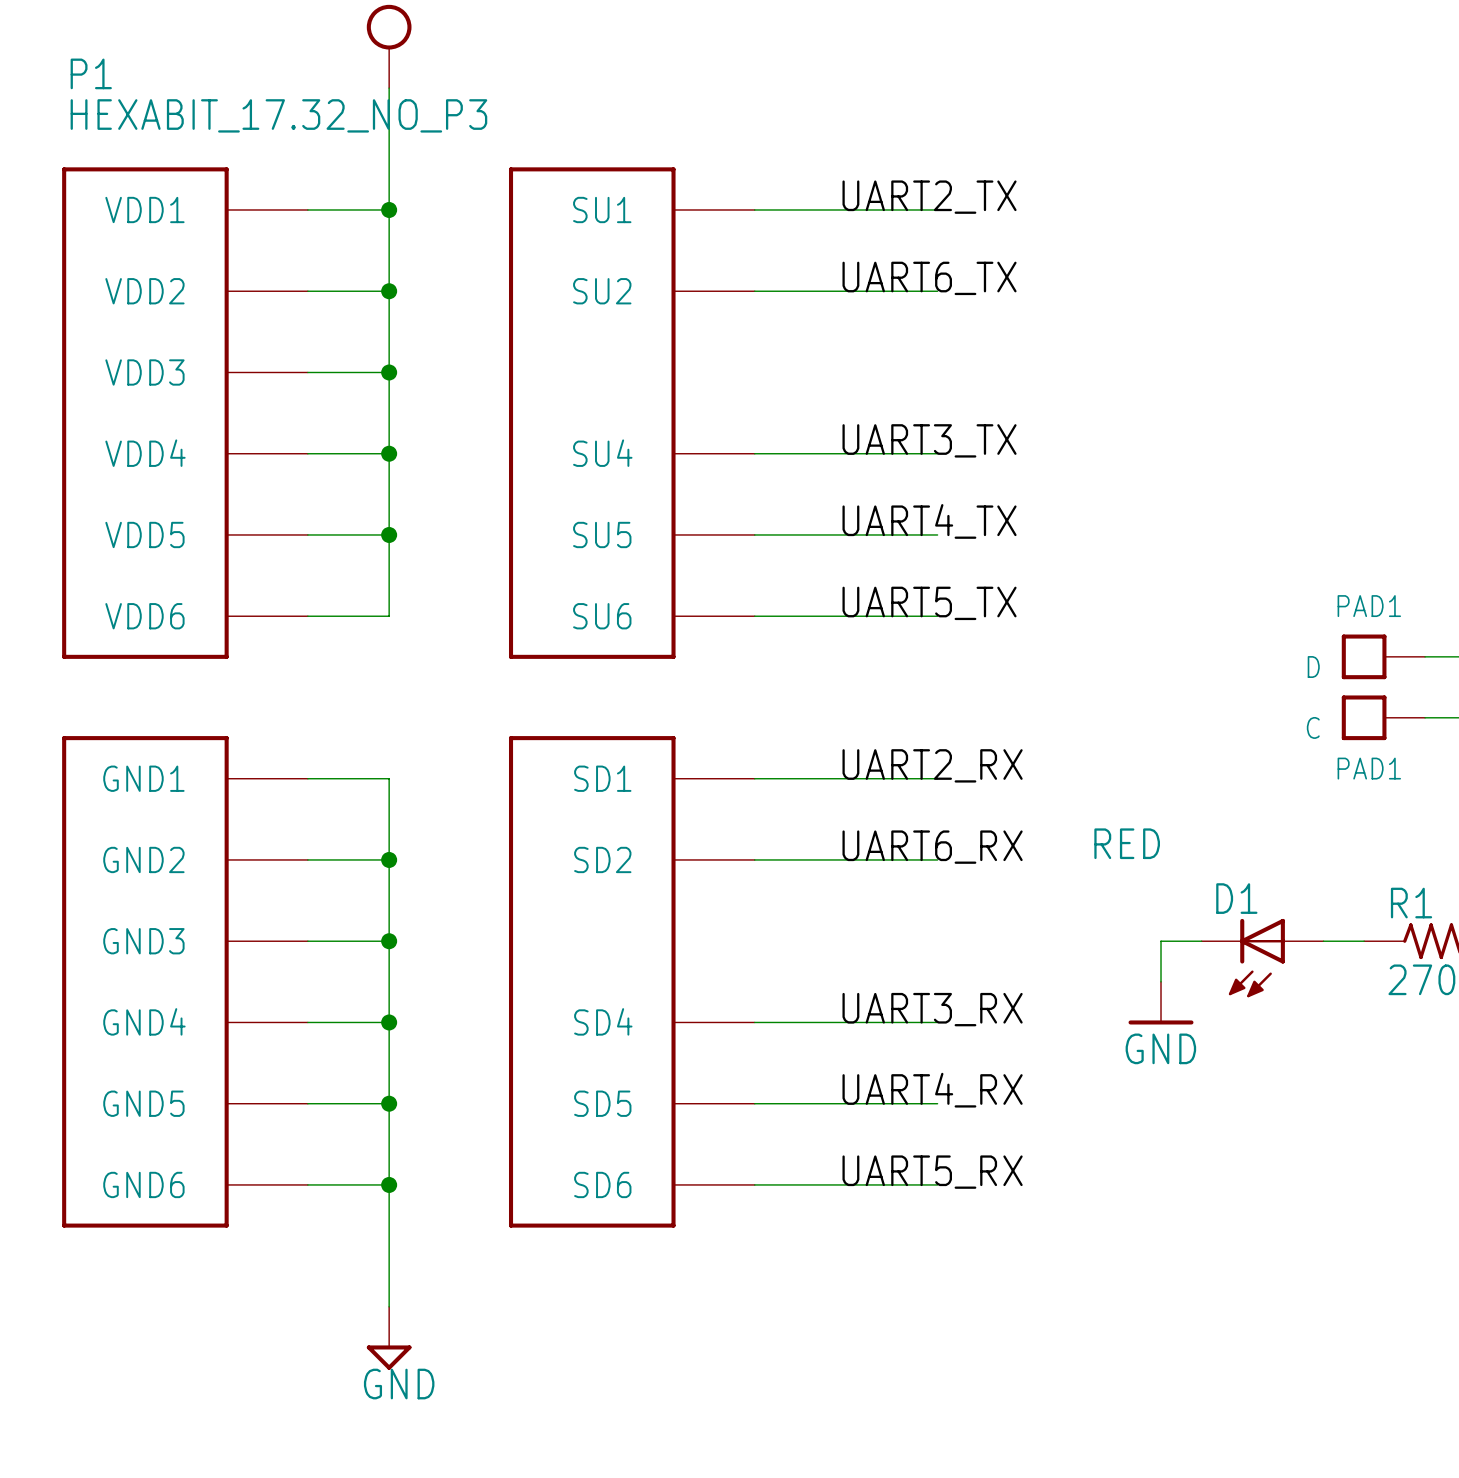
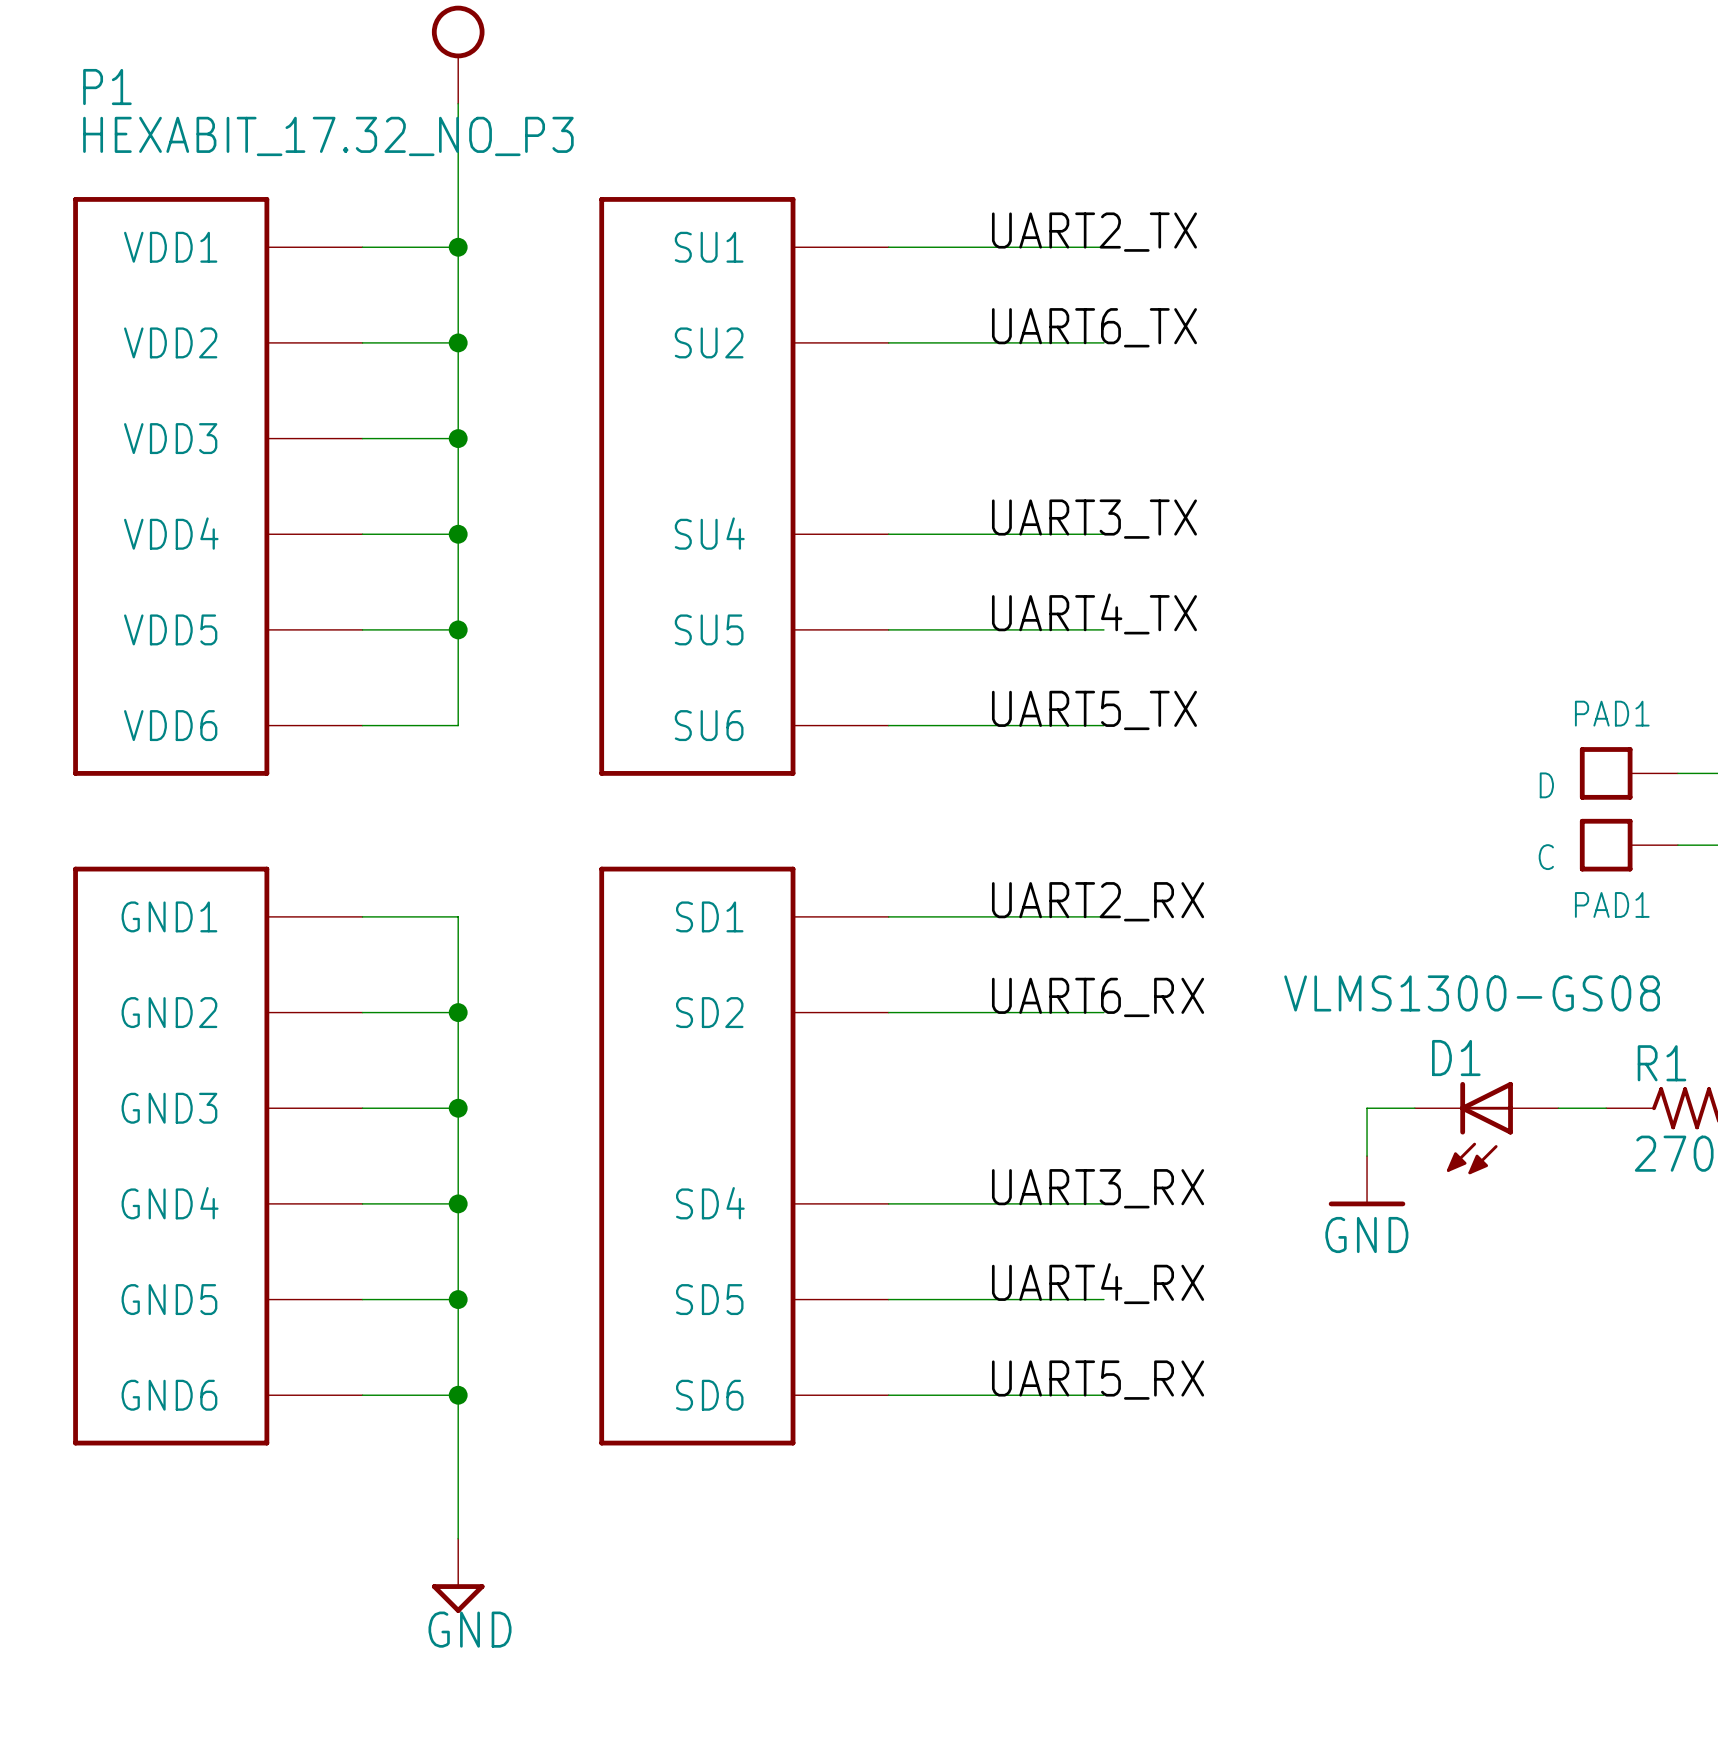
D1 value: RED (1127, 843) -> VLMS1300-GS08 (1472, 993)

